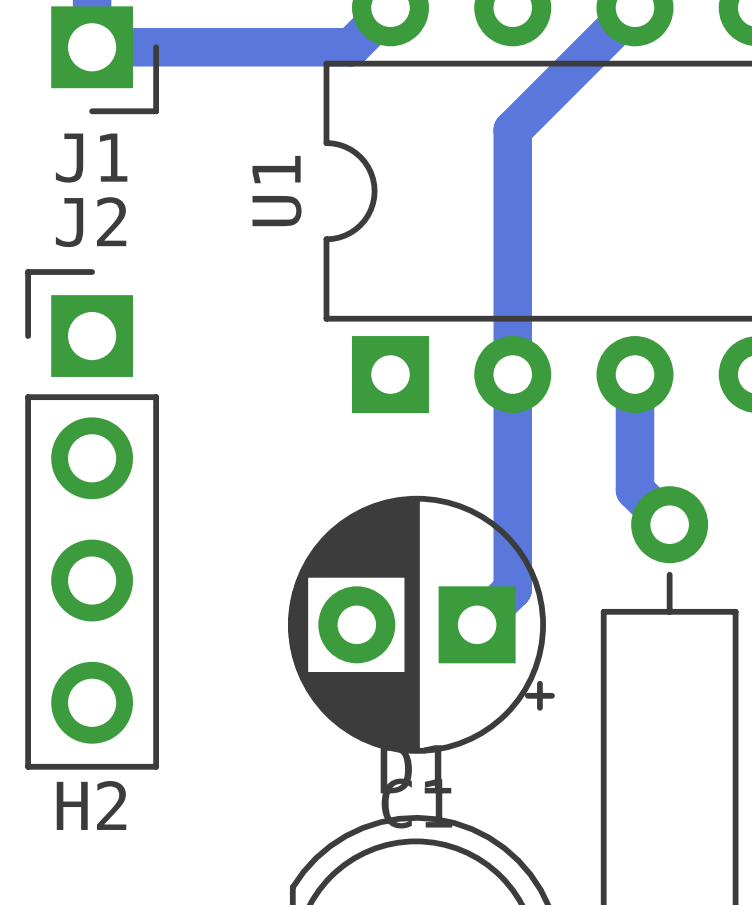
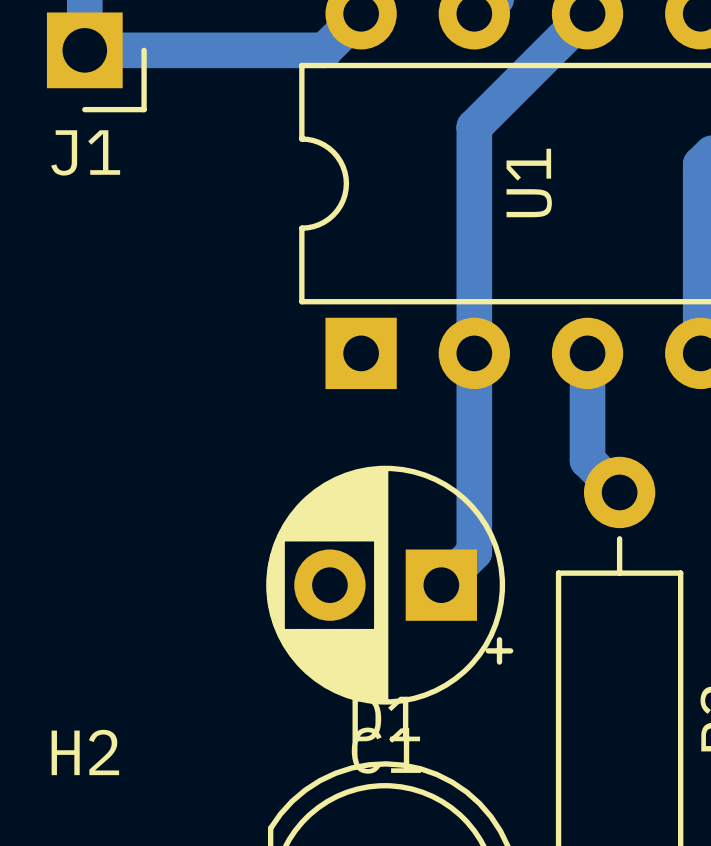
U1 name position: U1 (277, 191) -> U1 (529, 182)
J2: (92, 519) -> none

